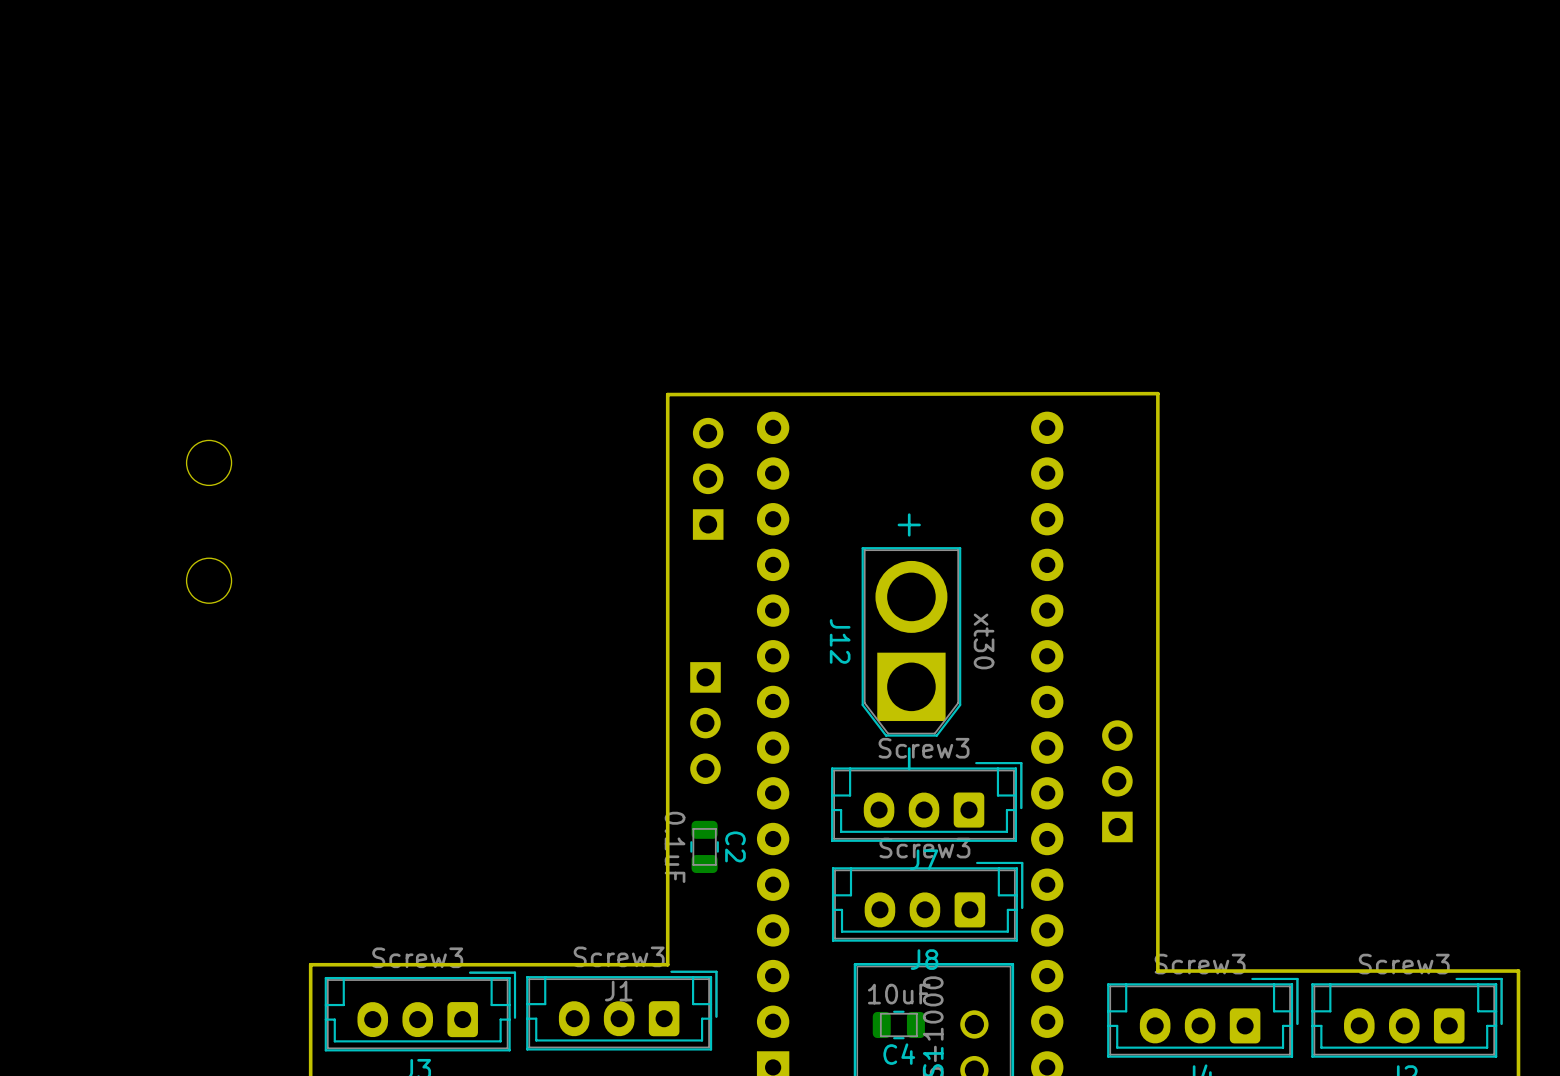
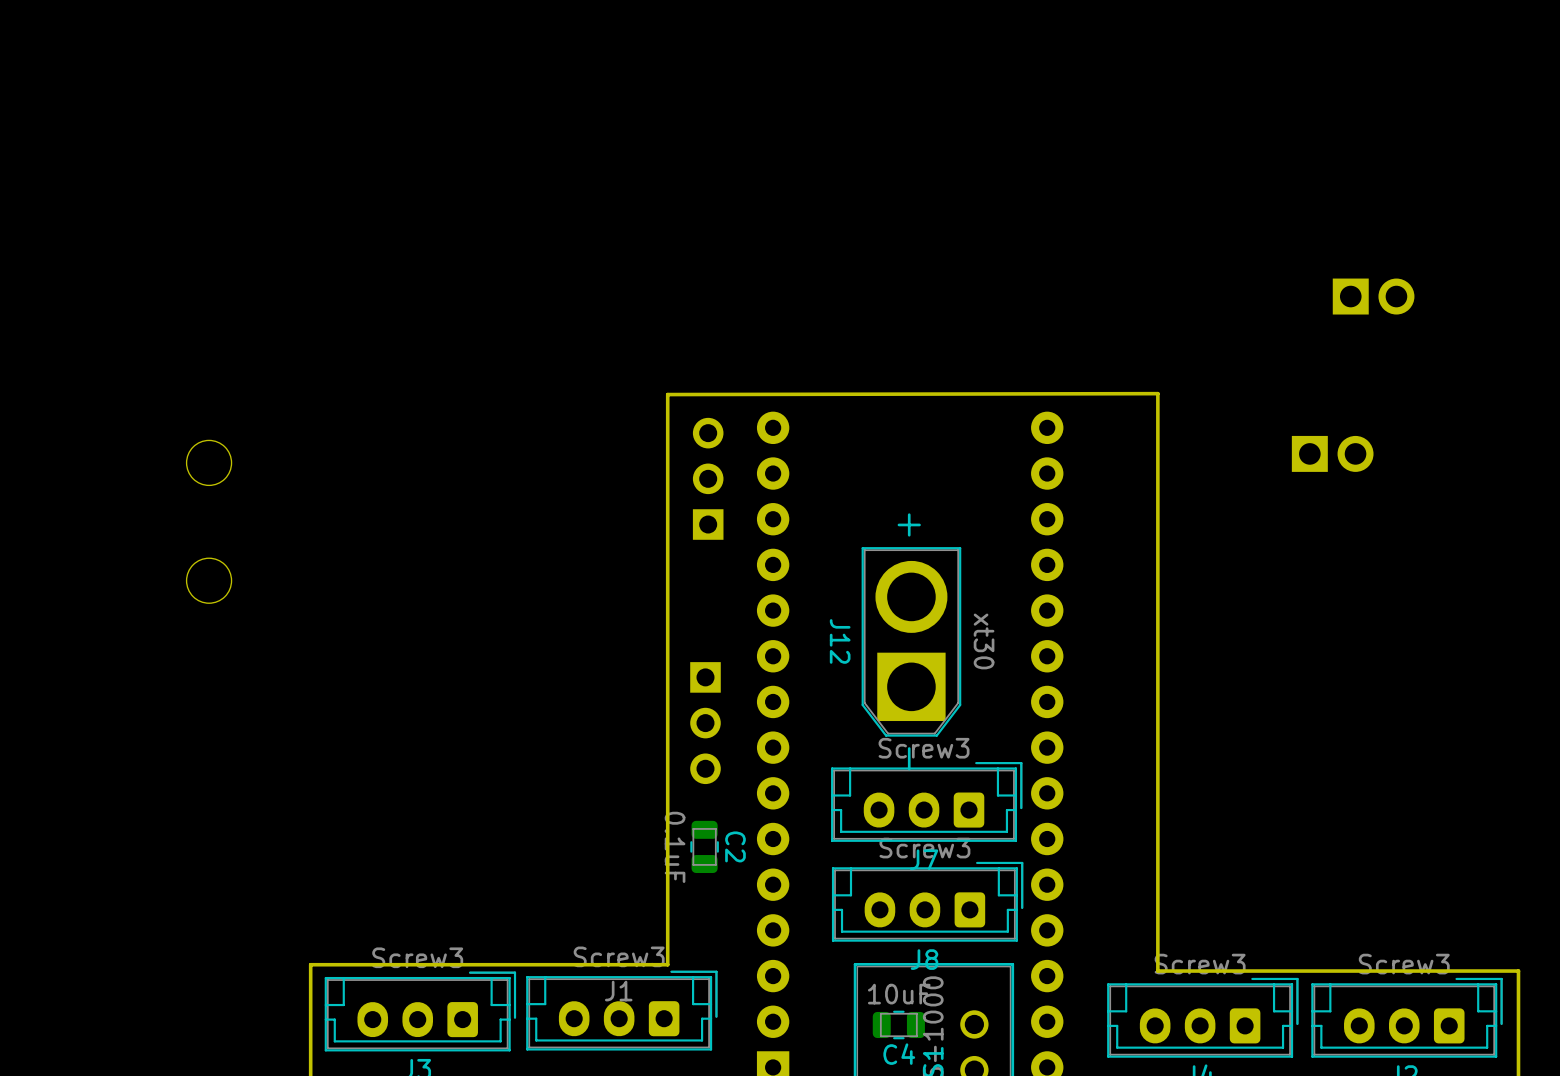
part: none -> (1373, 296)
part: none -> (1332, 453)
part: (1117, 781) -> none

